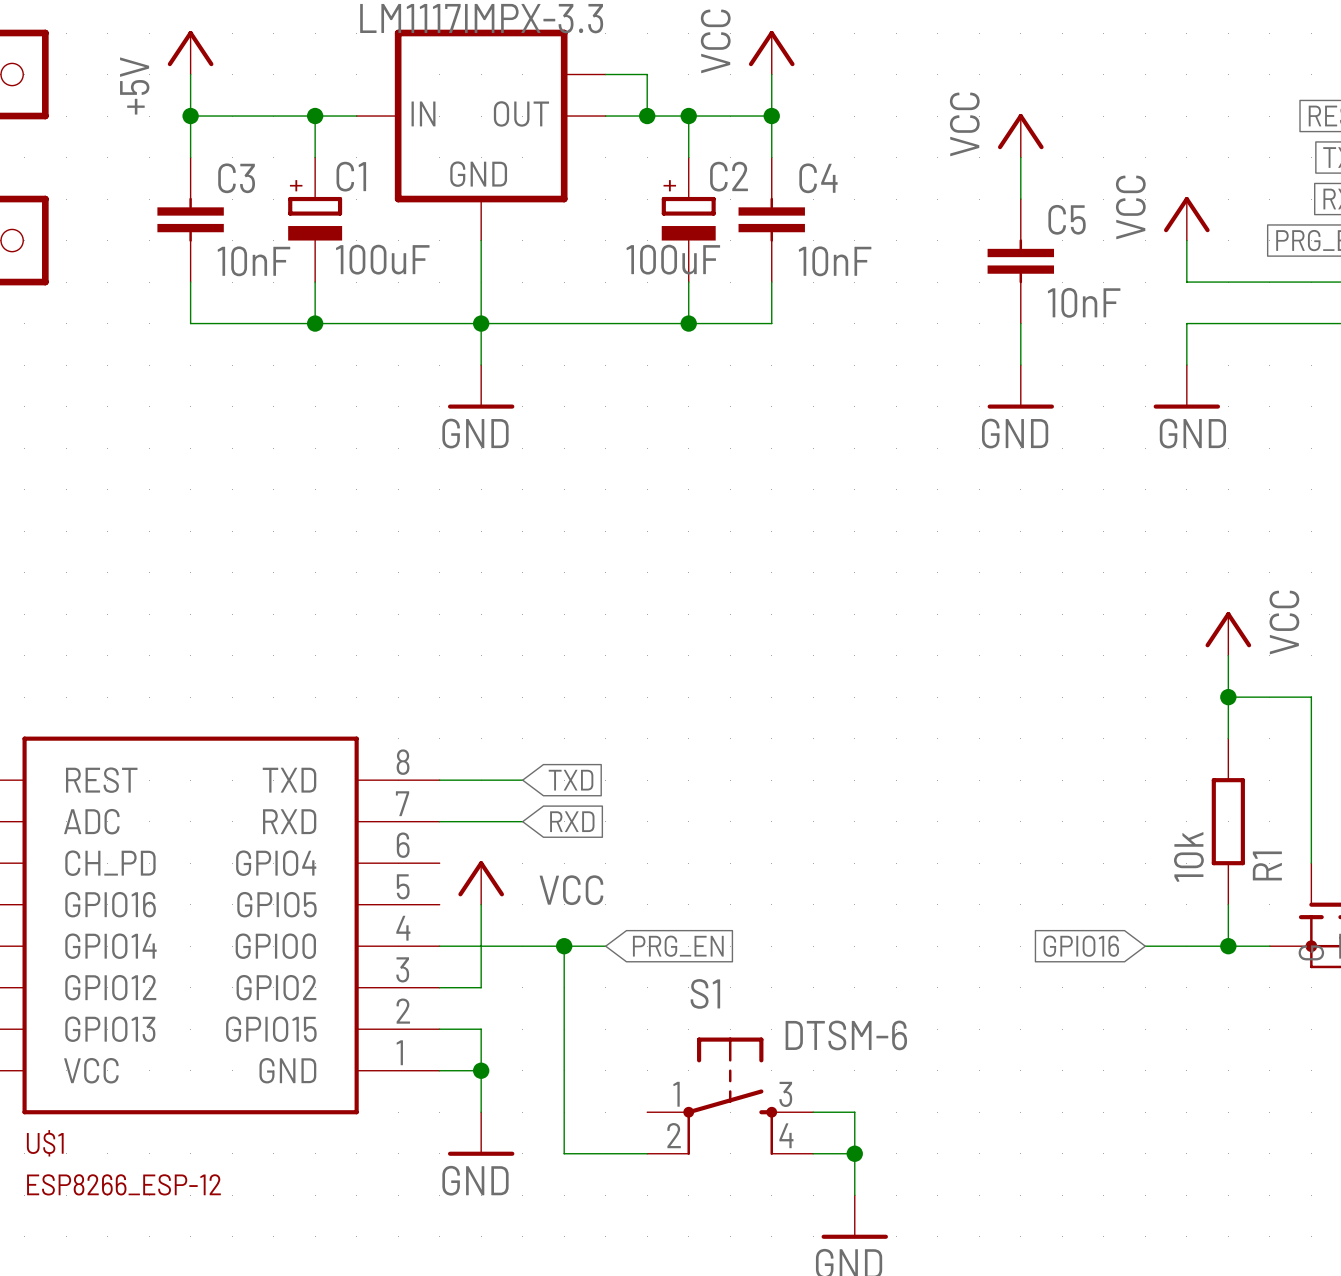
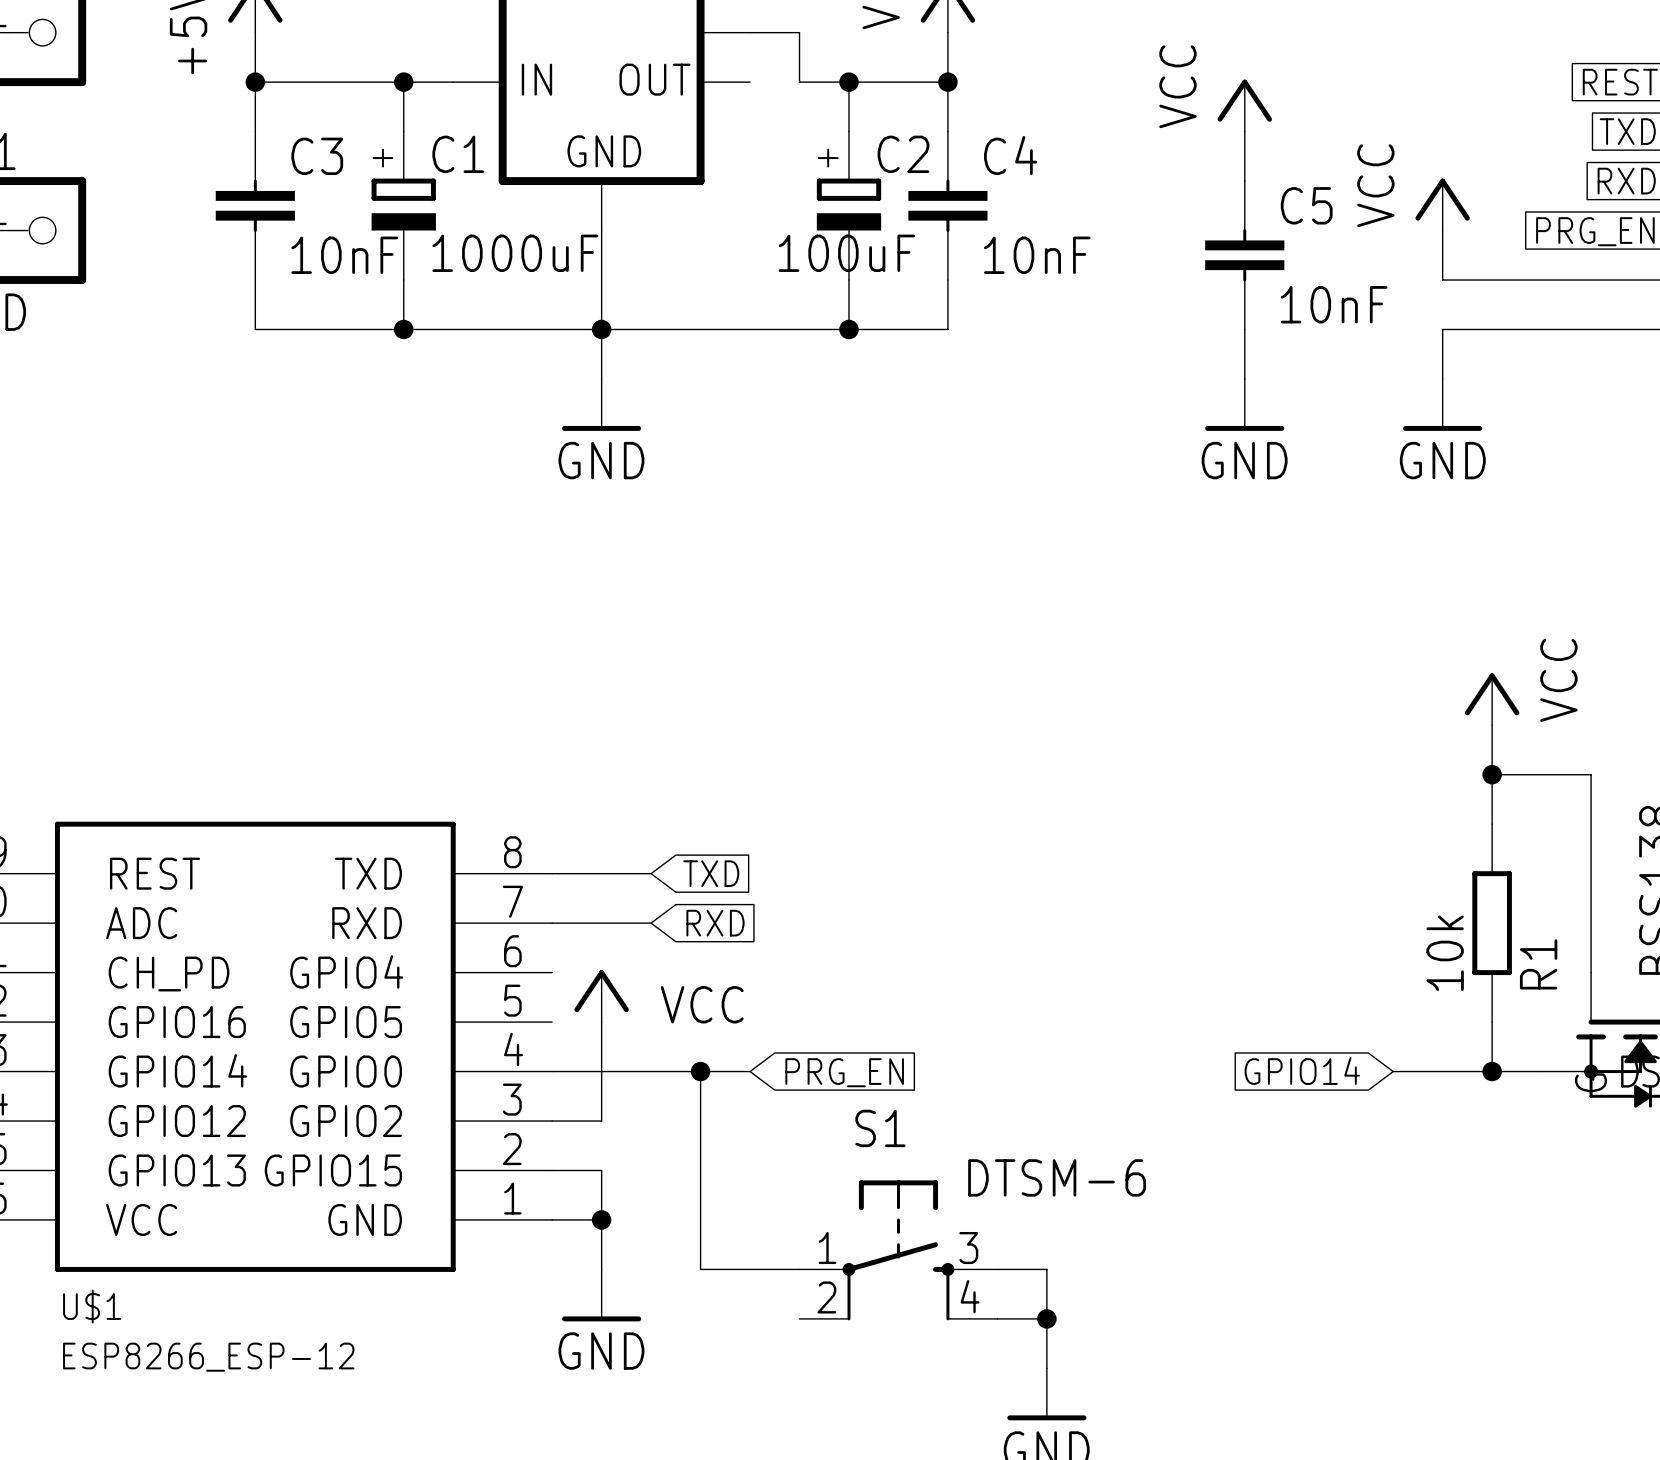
wire: (605, 116) (647, 116) -> none
junction: (647, 116) -> none
C1 value: 100uF (382, 259) -> 1000uF (515, 253)
global label: GPIO16 (1081, 946) -> GPIO14 (1302, 1070)
wire: (564, 1112) (564, 1153) (647, 1153) -> (700, 1269) (799, 1269)

